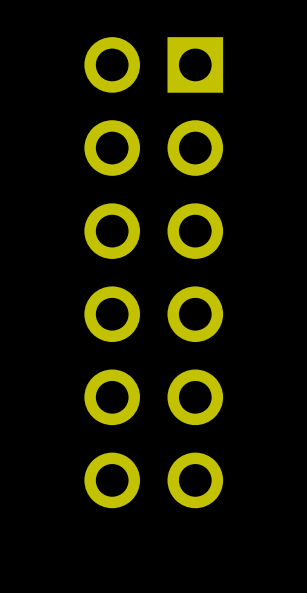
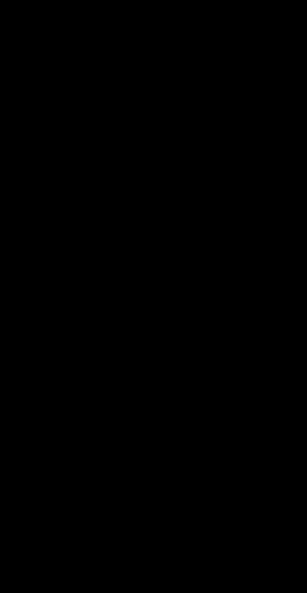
part: (153, 272) -> none

